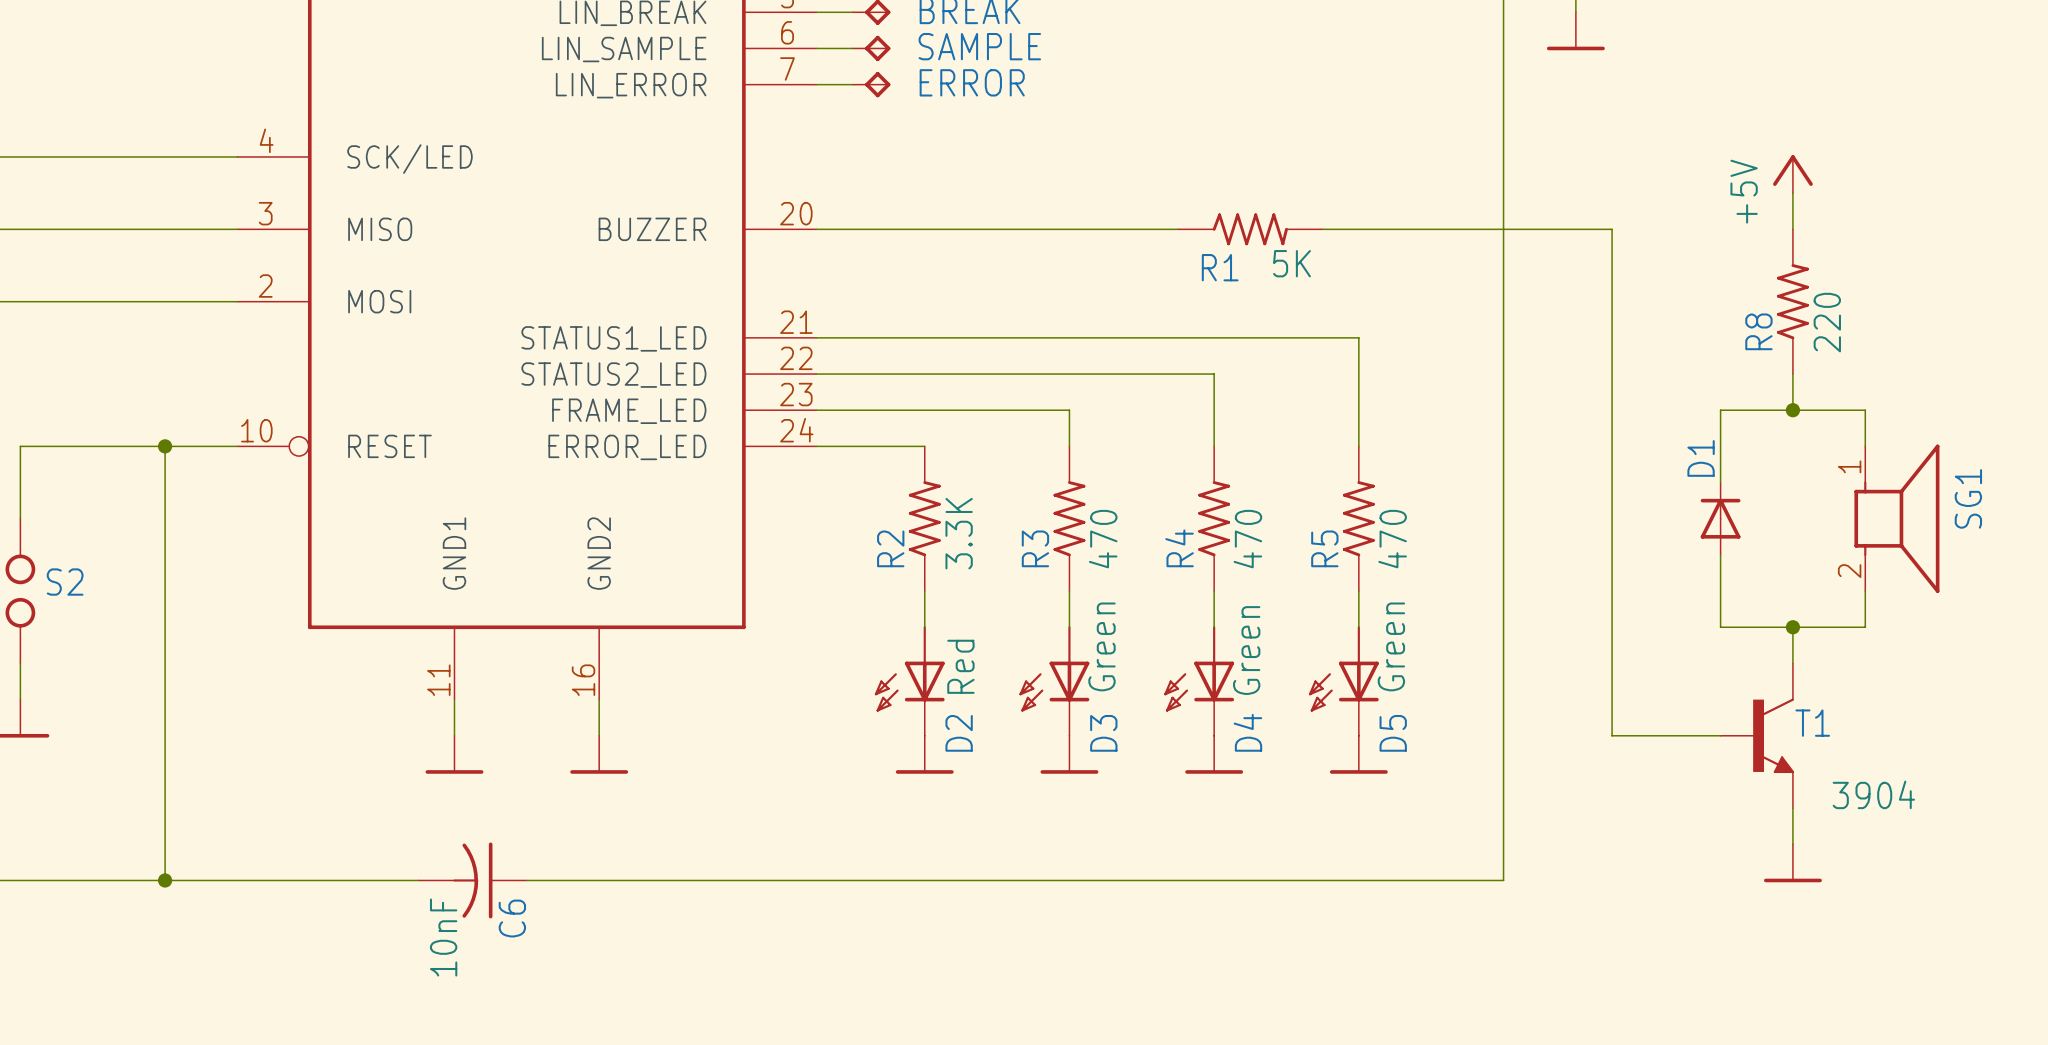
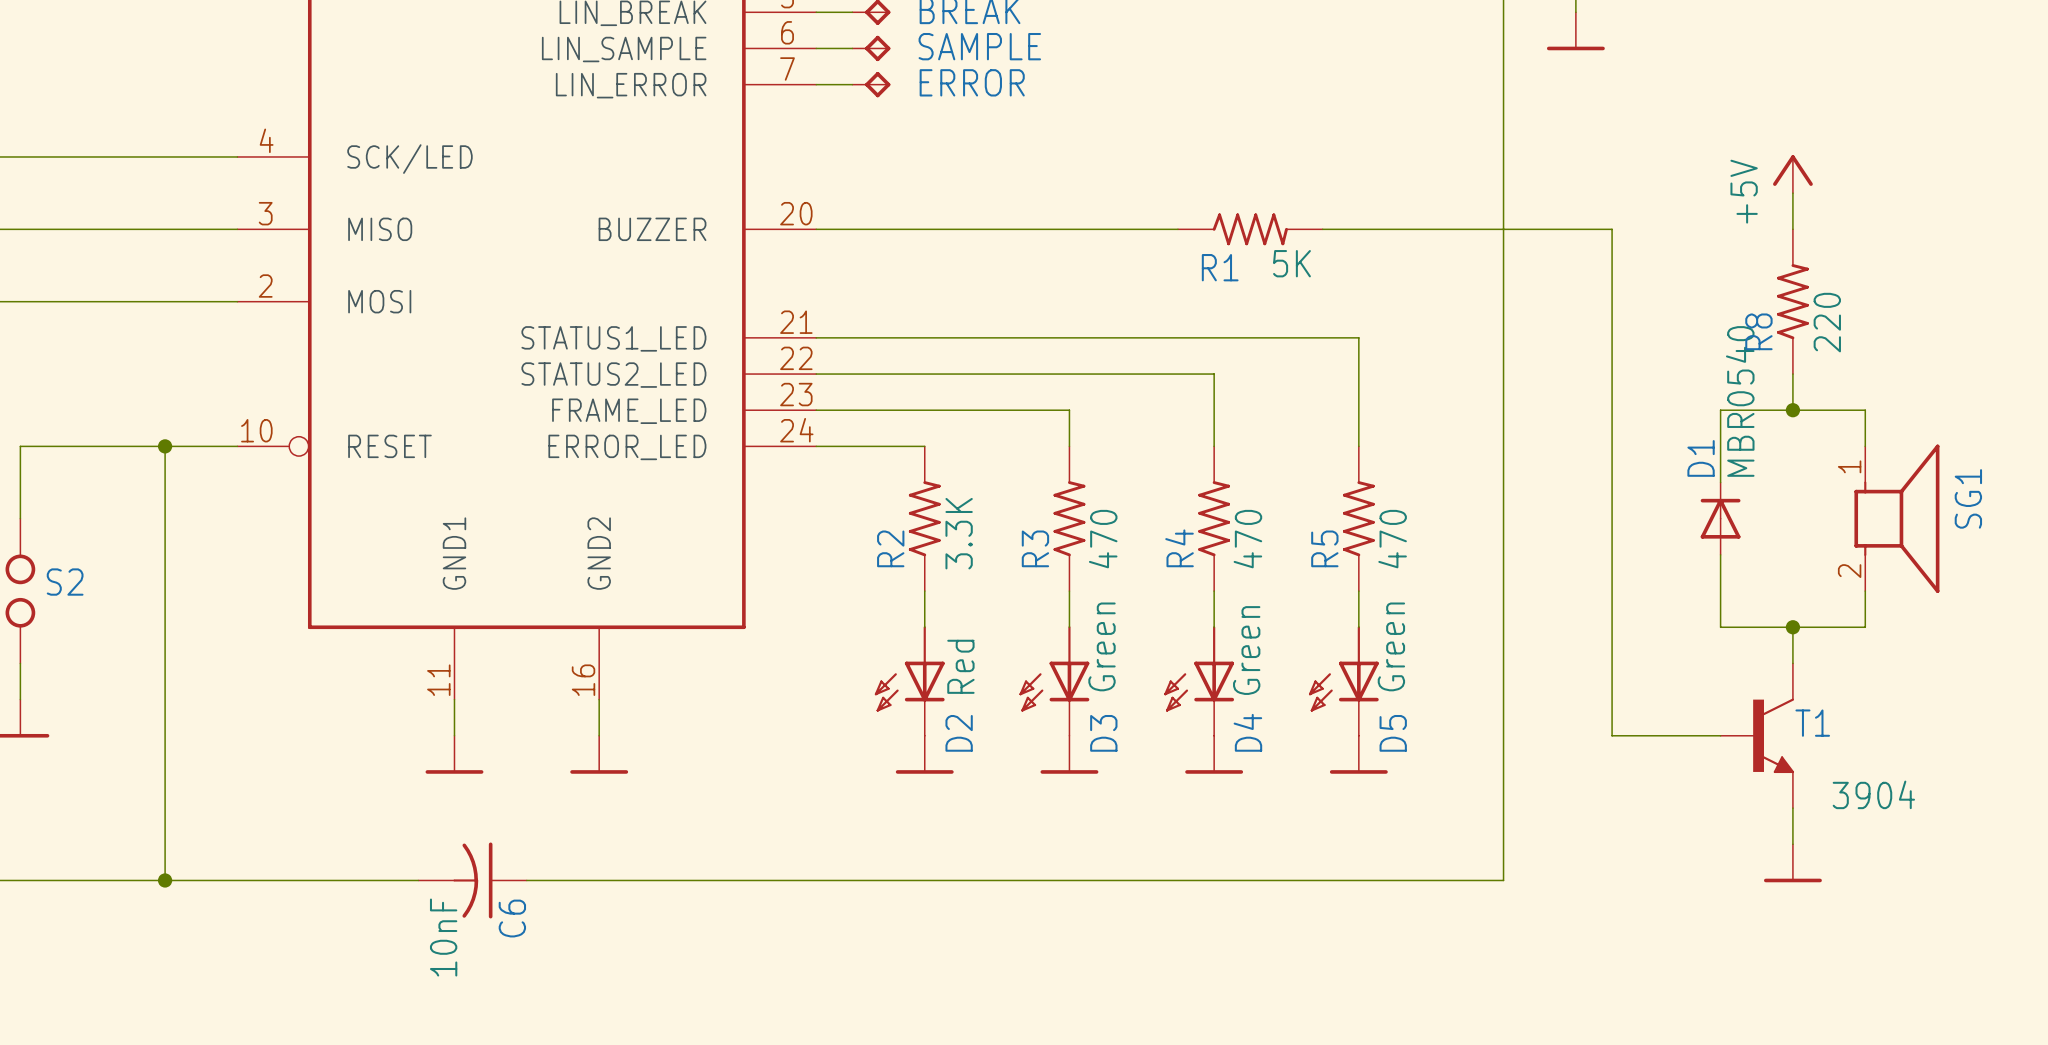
D1 value: none -> MBR0540 (1740, 401)

